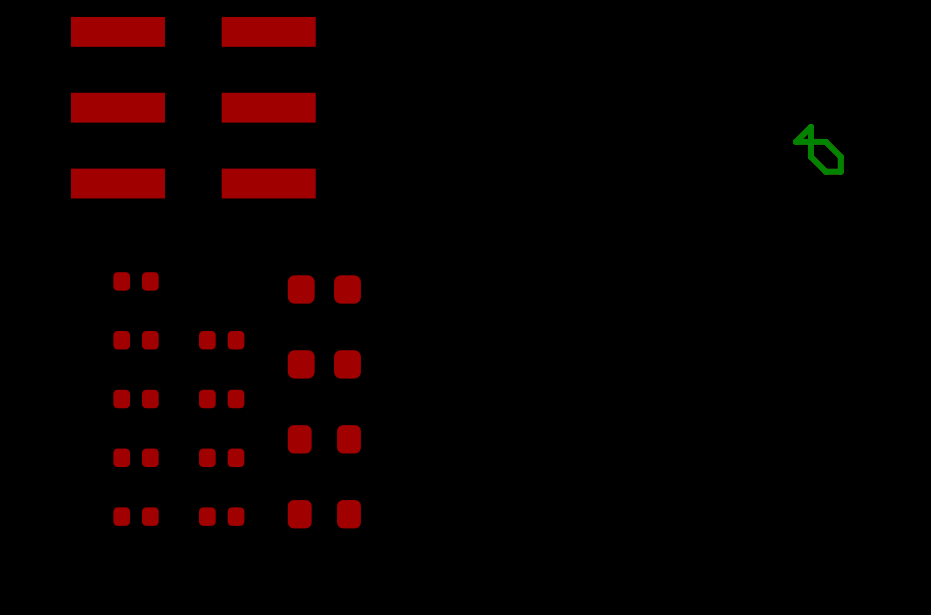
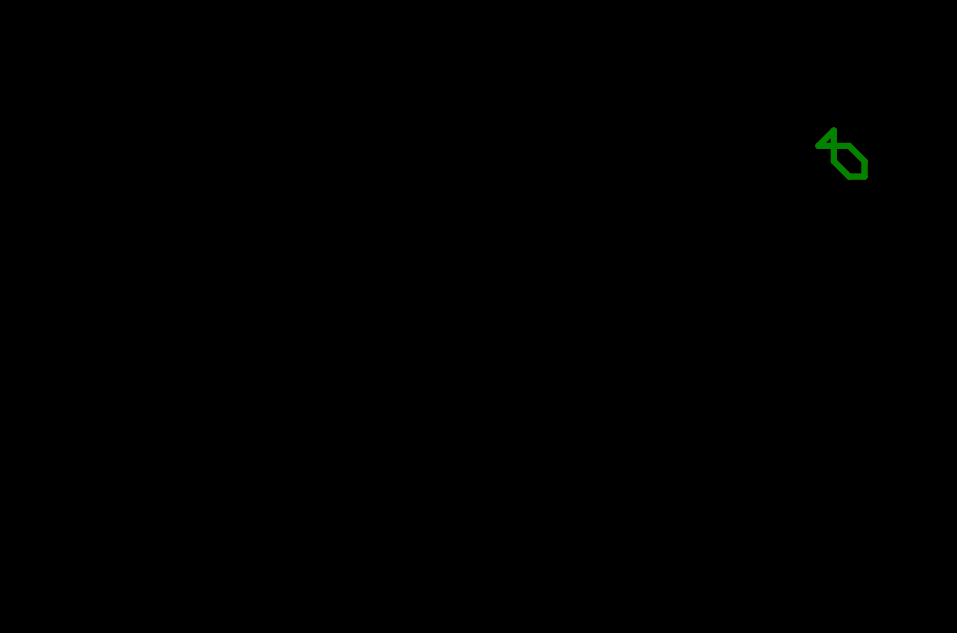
part: (193, 107) -> none
part: (136, 281) -> none
part: (324, 289) -> none
part: (136, 340) -> none
part: (221, 340) -> none
part: (324, 364) -> none
part: (136, 399) -> none
part: (221, 399) -> none
part: (324, 439) -> none
part: (136, 457) -> none
part: (221, 457) -> none
part: (324, 514) -> none
part: (136, 516) -> none
part: (221, 516) -> none

